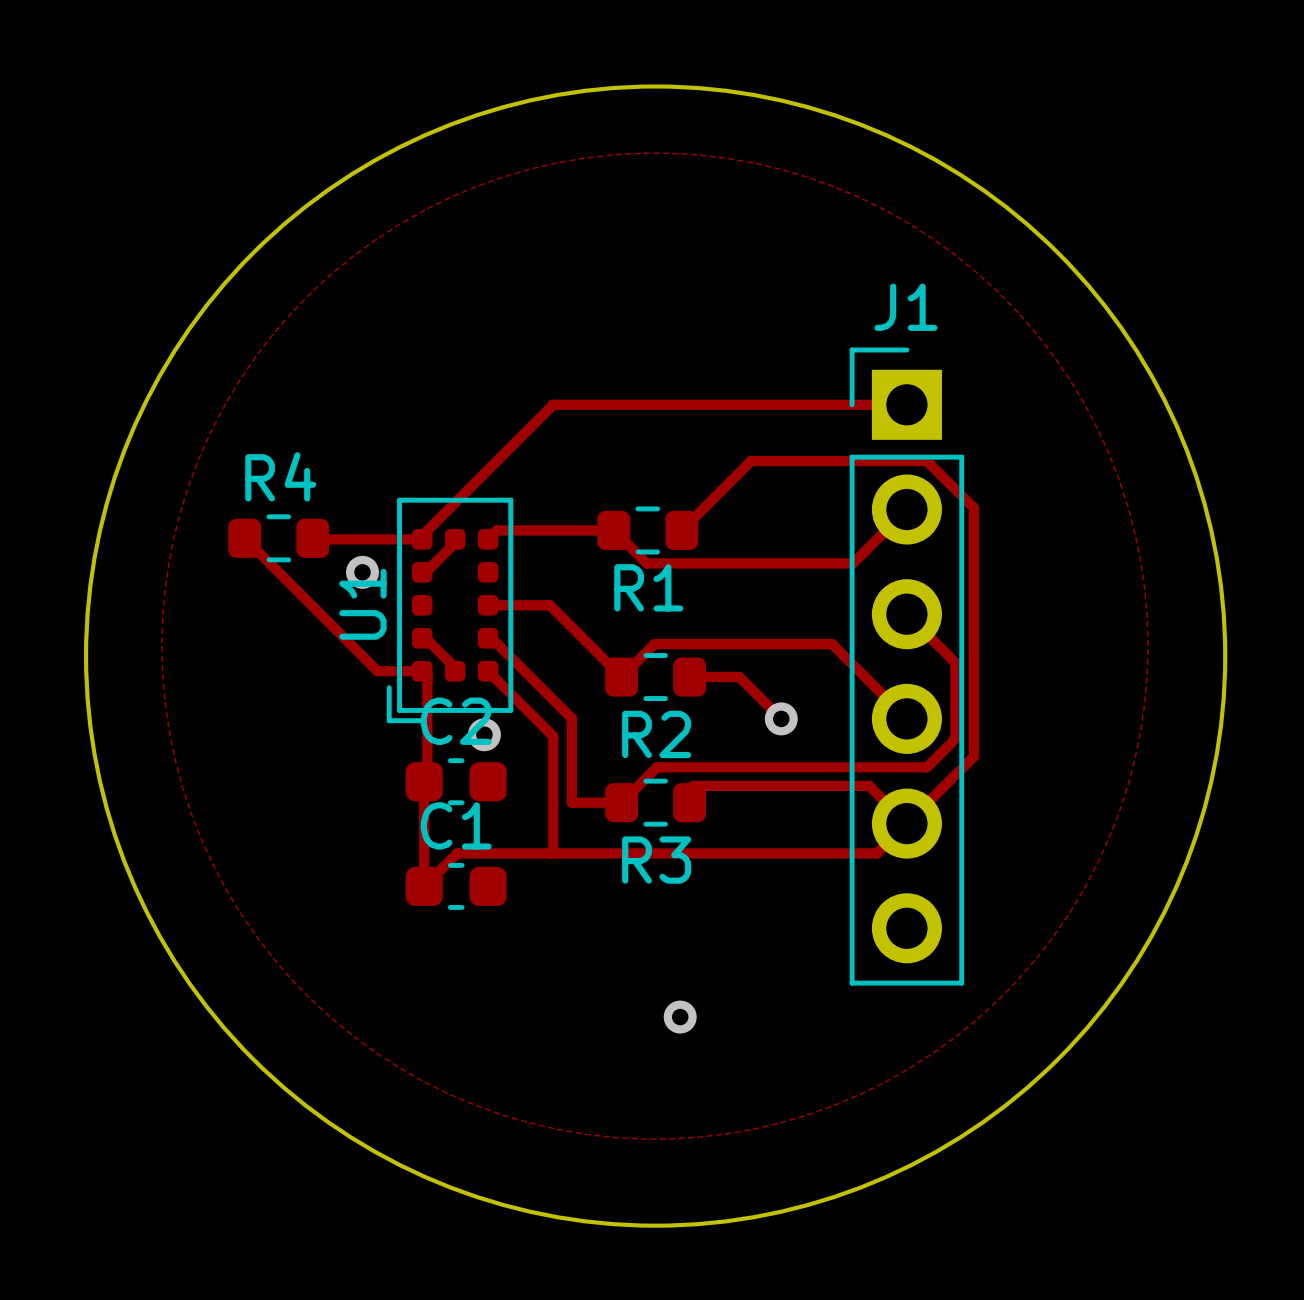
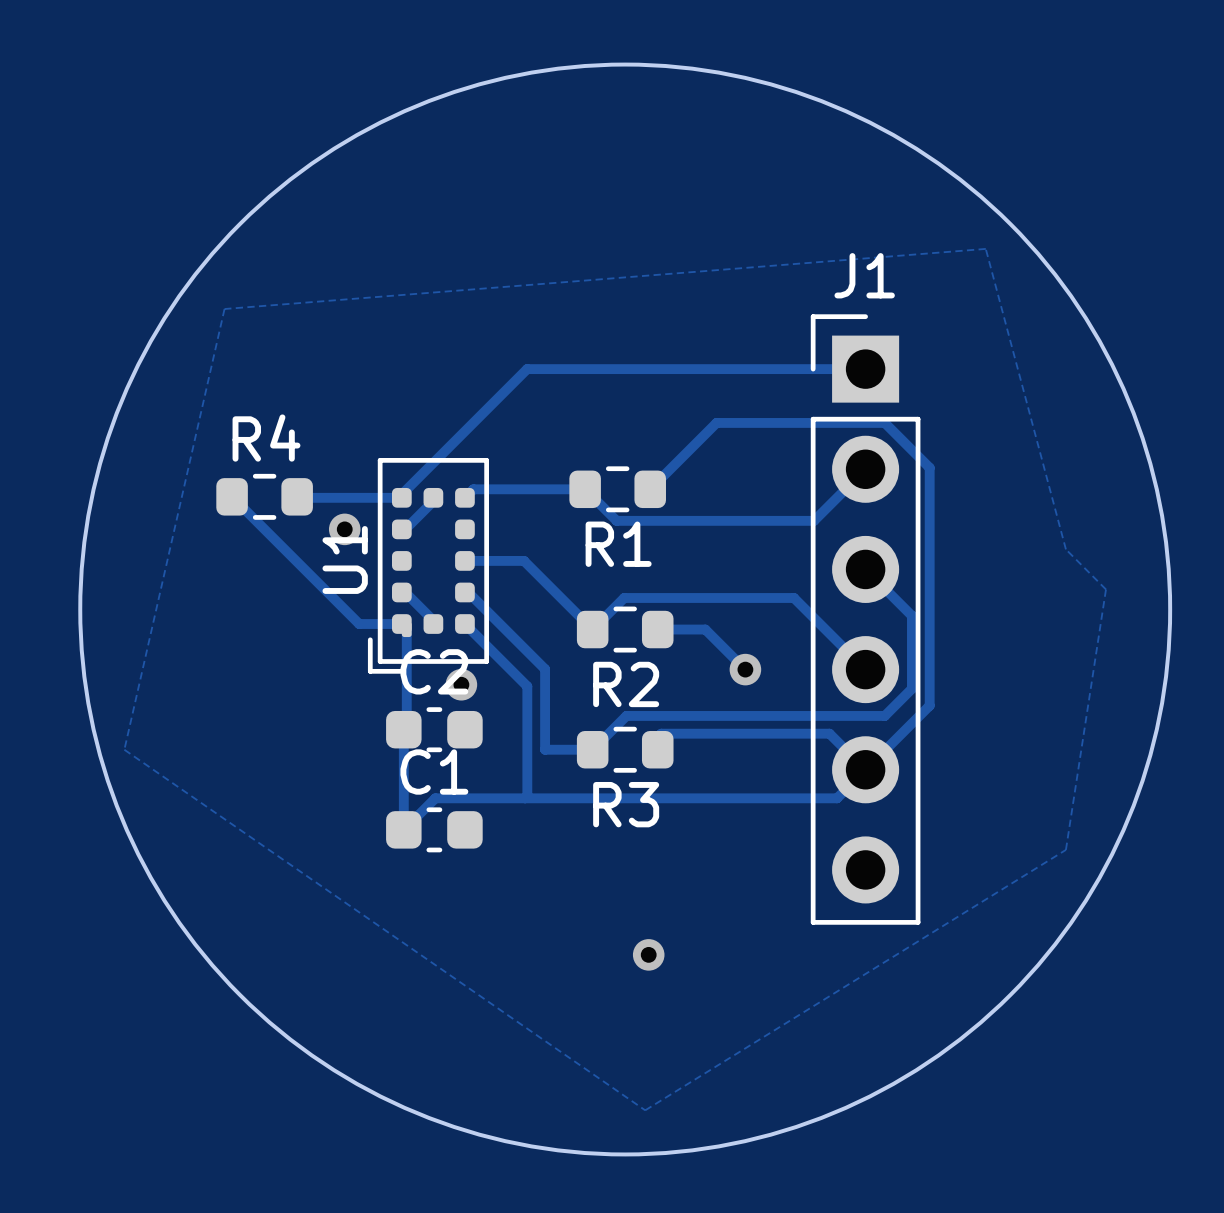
zone outline: (640, 153) (697, 154) (752, 162) (780, 169) (833, 186) (885, 210) (909, 223) (933, 239) (977, 273) (998, 292) (1036, 334) (1069, 379) (1097, 428) (1119, 480) (1128, 507) (1140, 562) (1147, 617) (1147, 674) (1140, 730) (1128, 785) (1119, 811) (1109, 838) (1084, 888) (1053, 935) (1018, 979) (977, 1018) (933, 1053) (885, 1082) (859, 1094) (807, 1115) (752, 1129) (725, 1134) (669, 1138) (612, 1137) (557, 1129) (529, 1122) (476, 1105) (424, 1082) (400, 1068) (376, 1053) (332, 1018) (311, 999) (273, 958) (240, 912) (212, 863) (190, 811) (181, 785) (169, 730) (162, 674) (162, 617) (169, 562) (181, 507) (190, 480) (200, 454) (225, 403) (256, 356) (291, 312) (332, 273) (376, 239) (424, 210) (450, 197) (502, 177) (557, 162) (584, 158) (640, 153) -> (985, 248) (224, 309) (124, 749) (645, 1110) (1065, 849) (1105, 589) (1065, 549) (985, 248)

